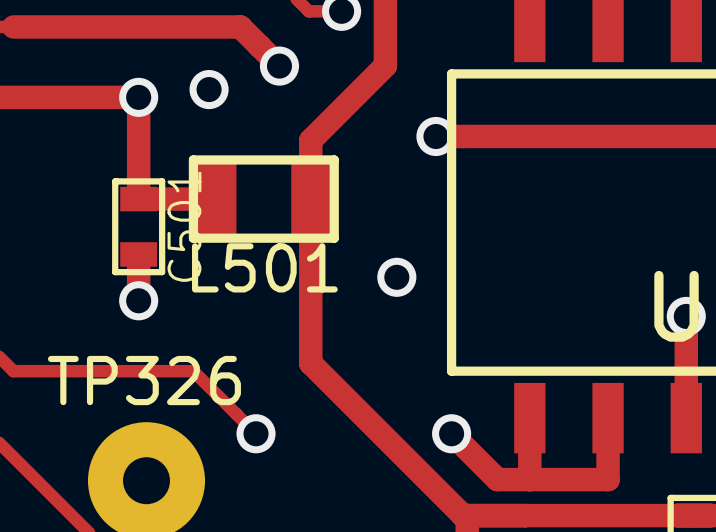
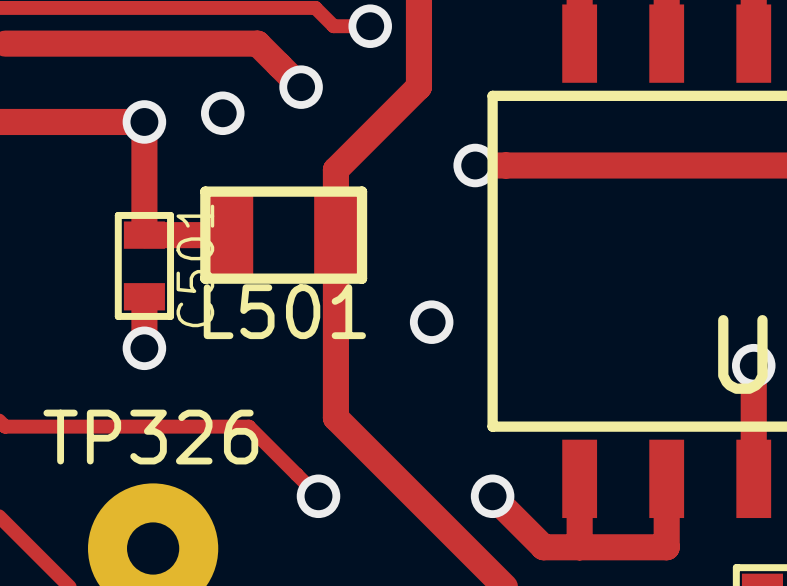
track: (193, 371) (256, 433) -> (205, 426) (248, 426) (318, 496)
via position: (256, 433) -> (318, 496)

